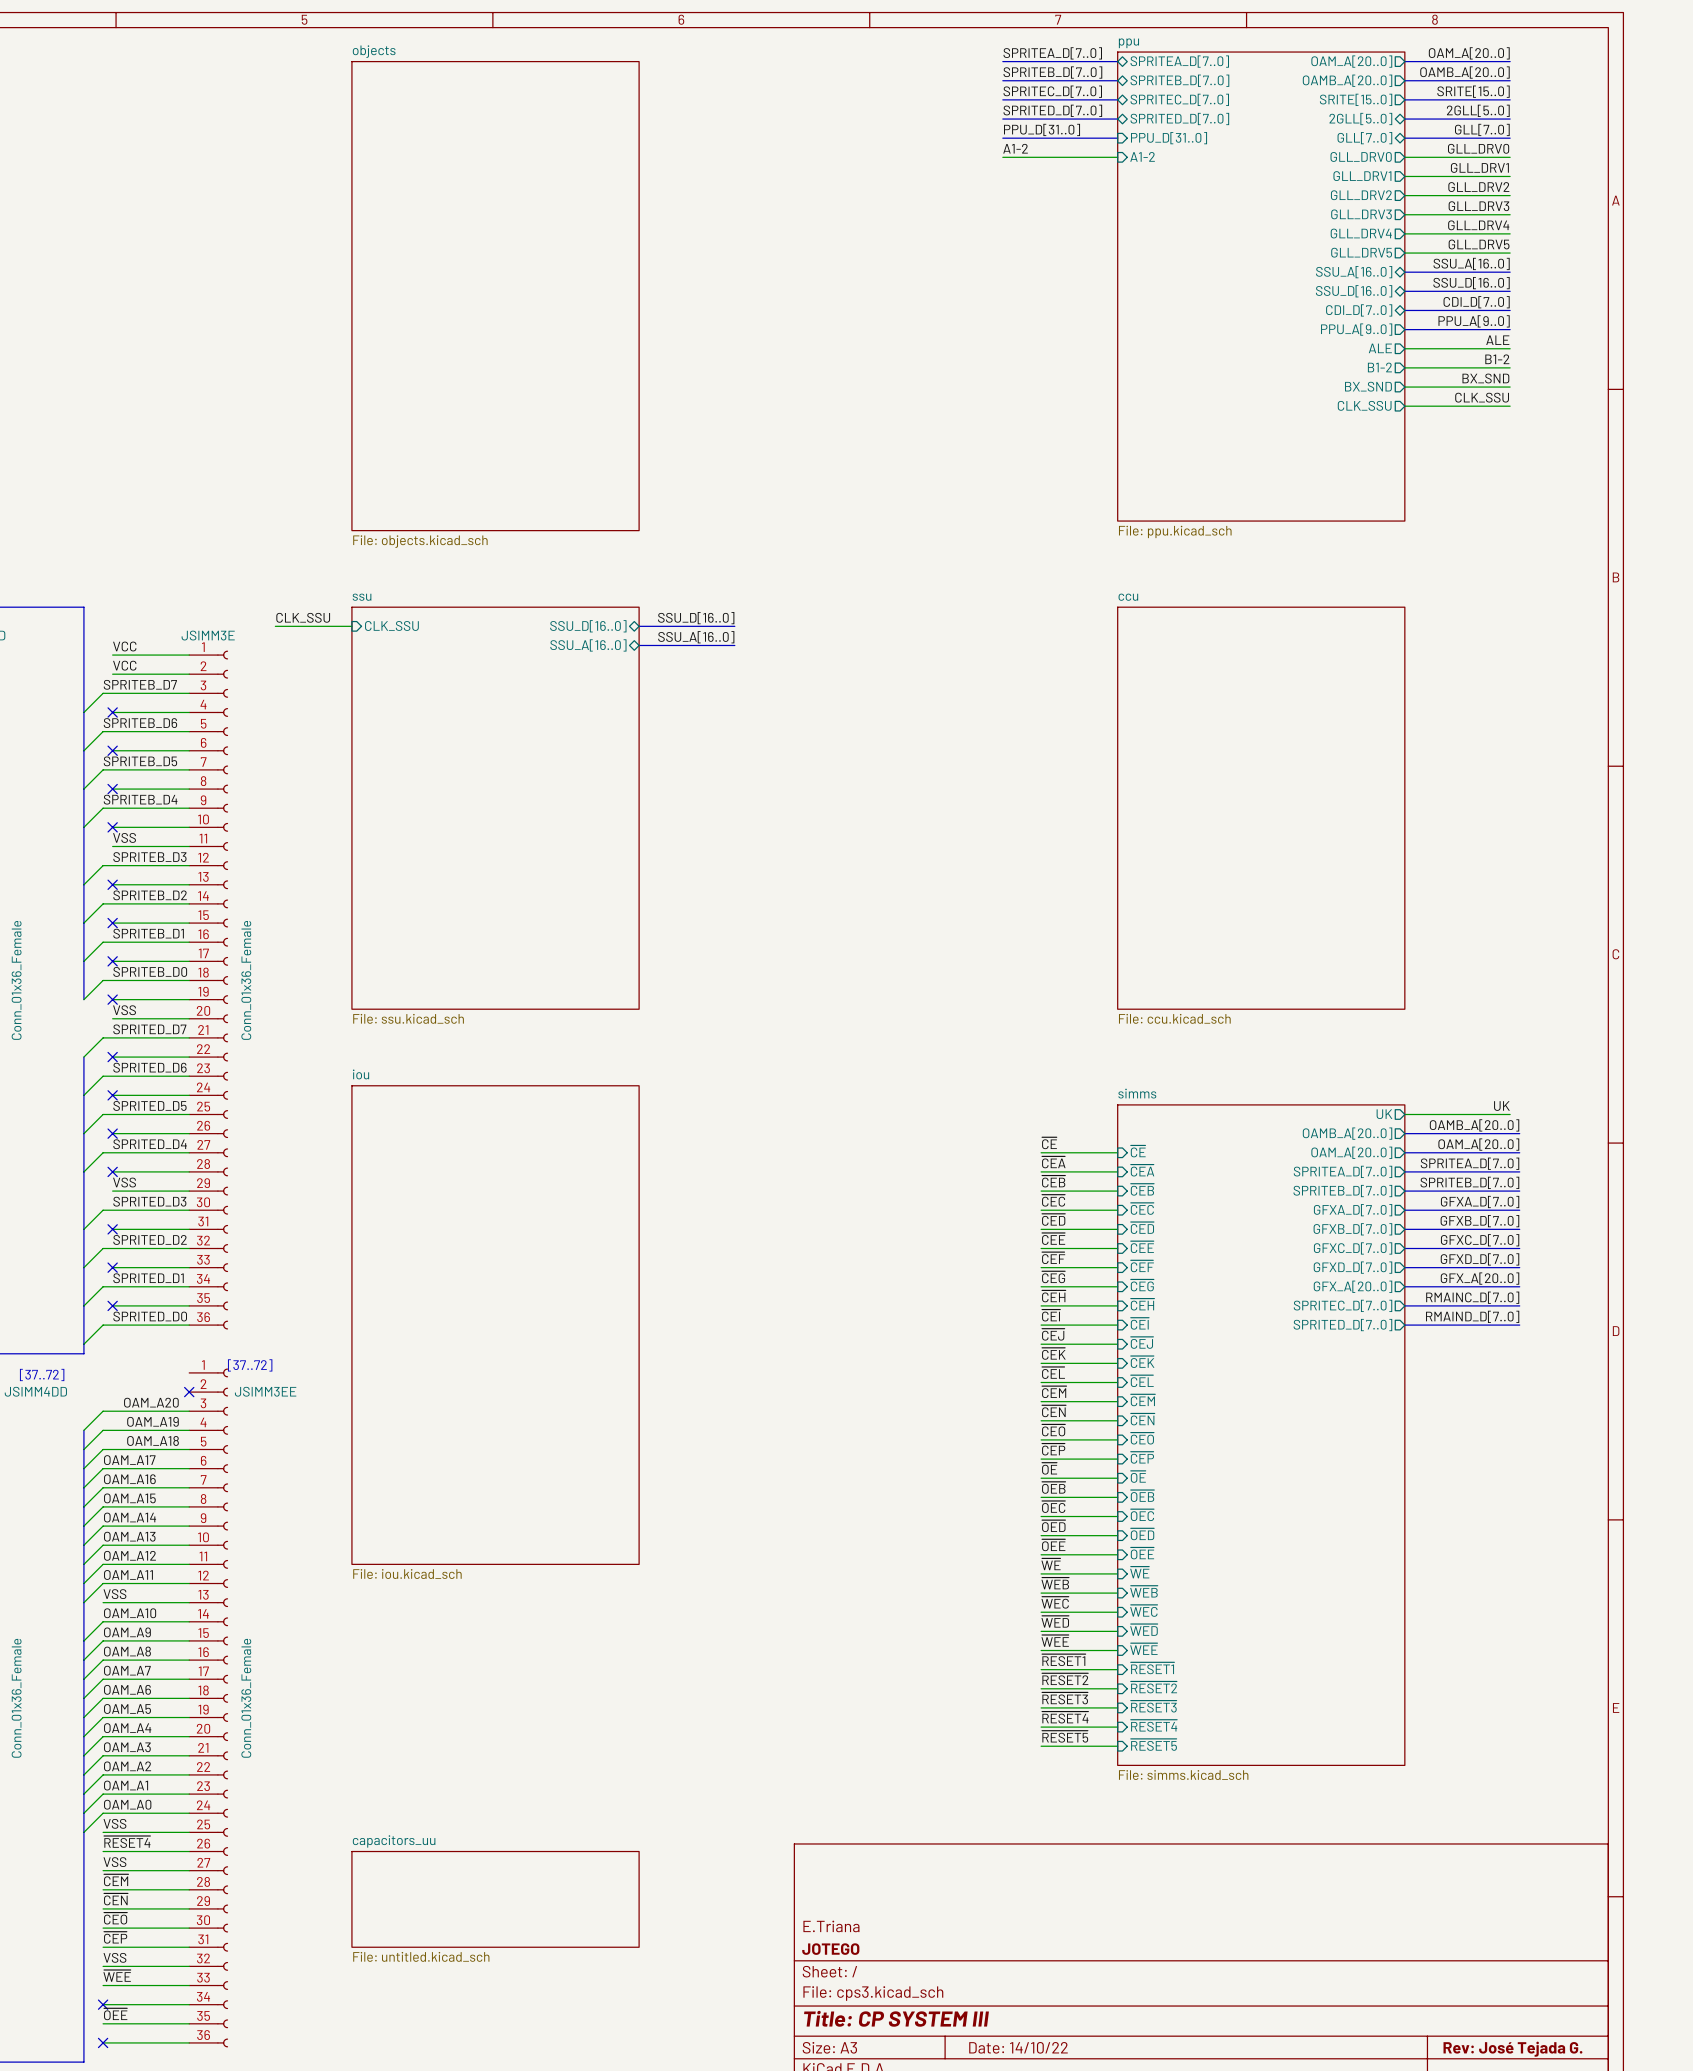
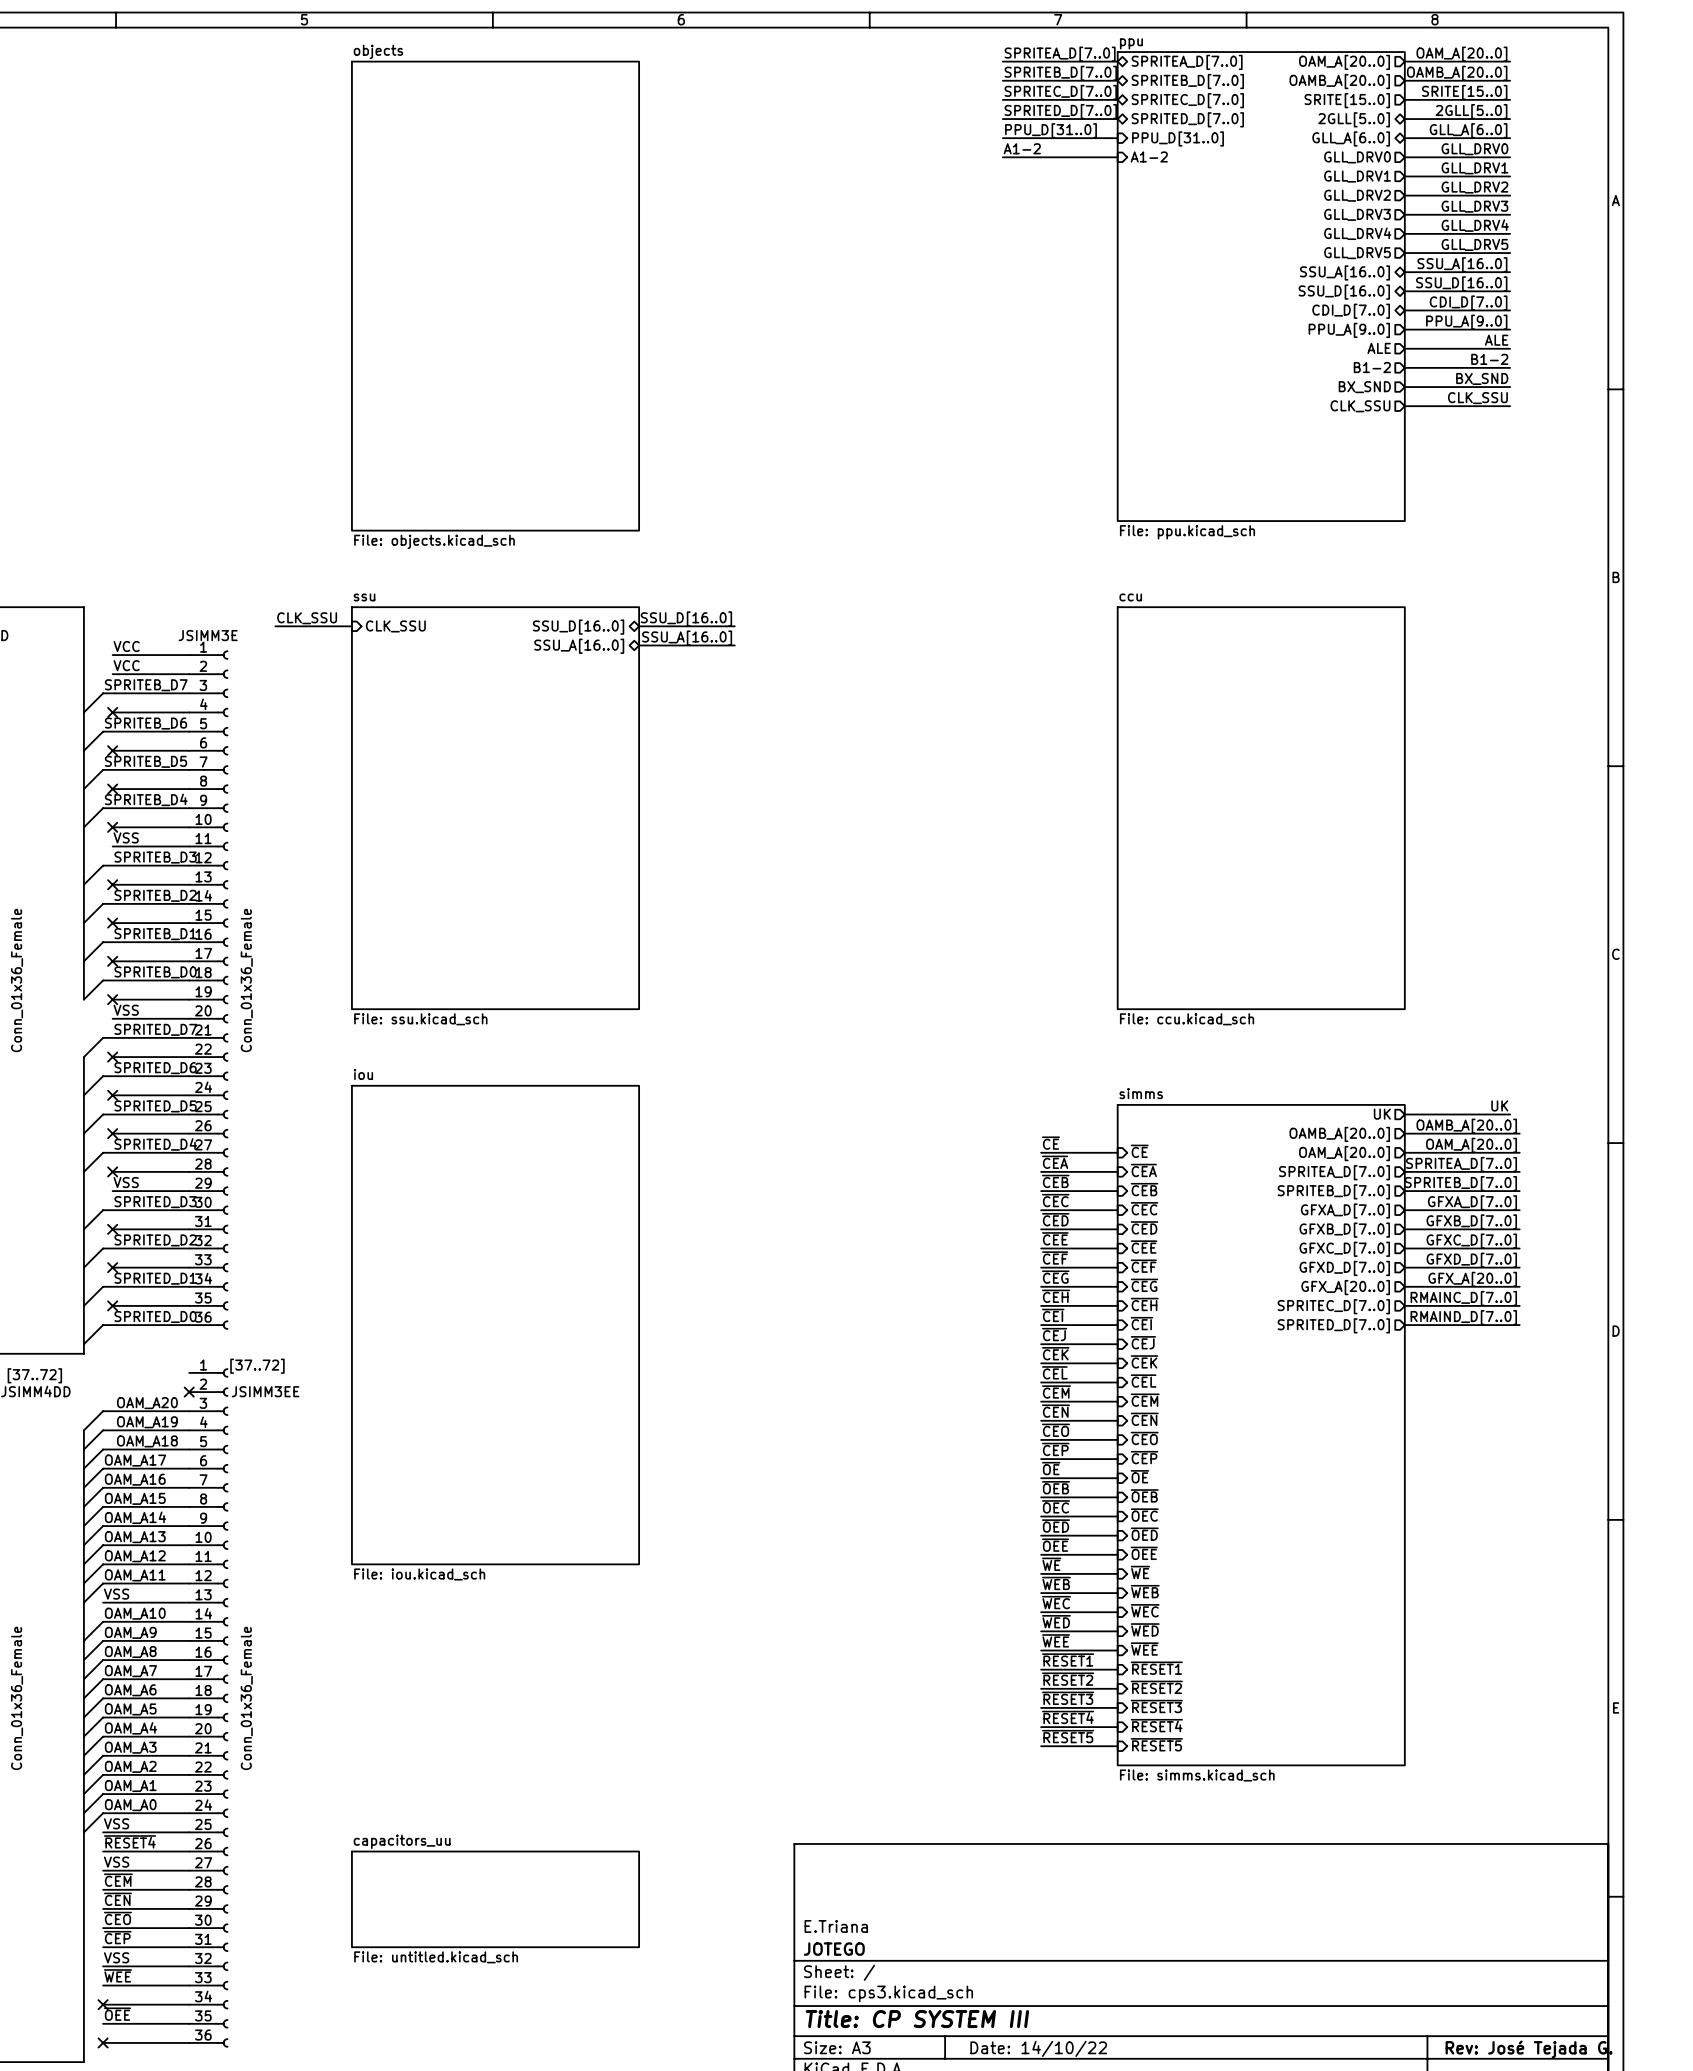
label: GLL[7..0] (1482, 129) -> GLL_A[6..0] (1468, 130)
sheet pin: GLL[7..0] (1364, 138) -> GLL_A[6..0] (1351, 138)

